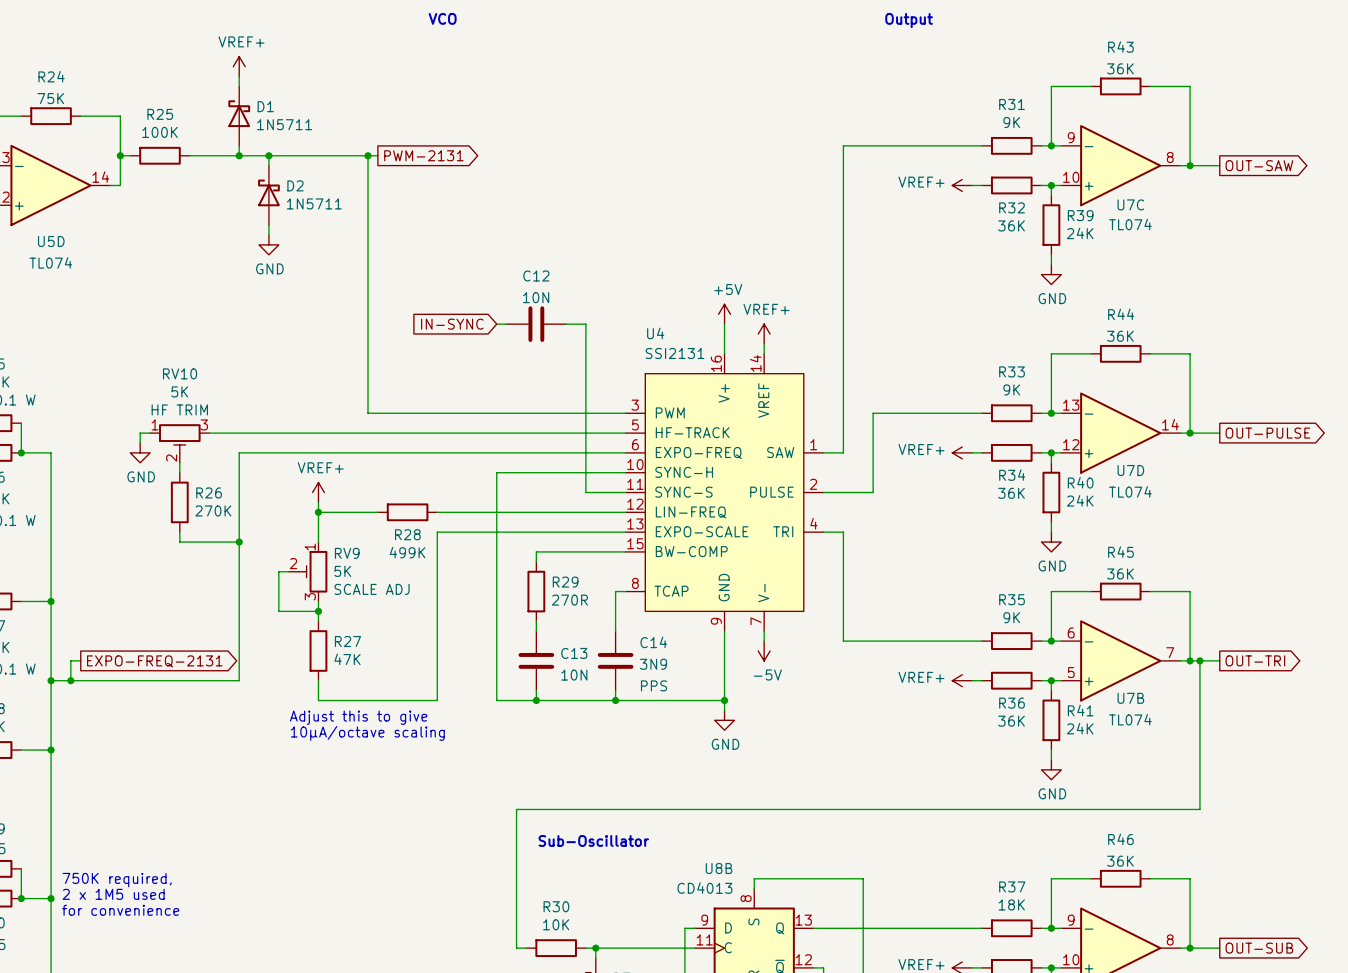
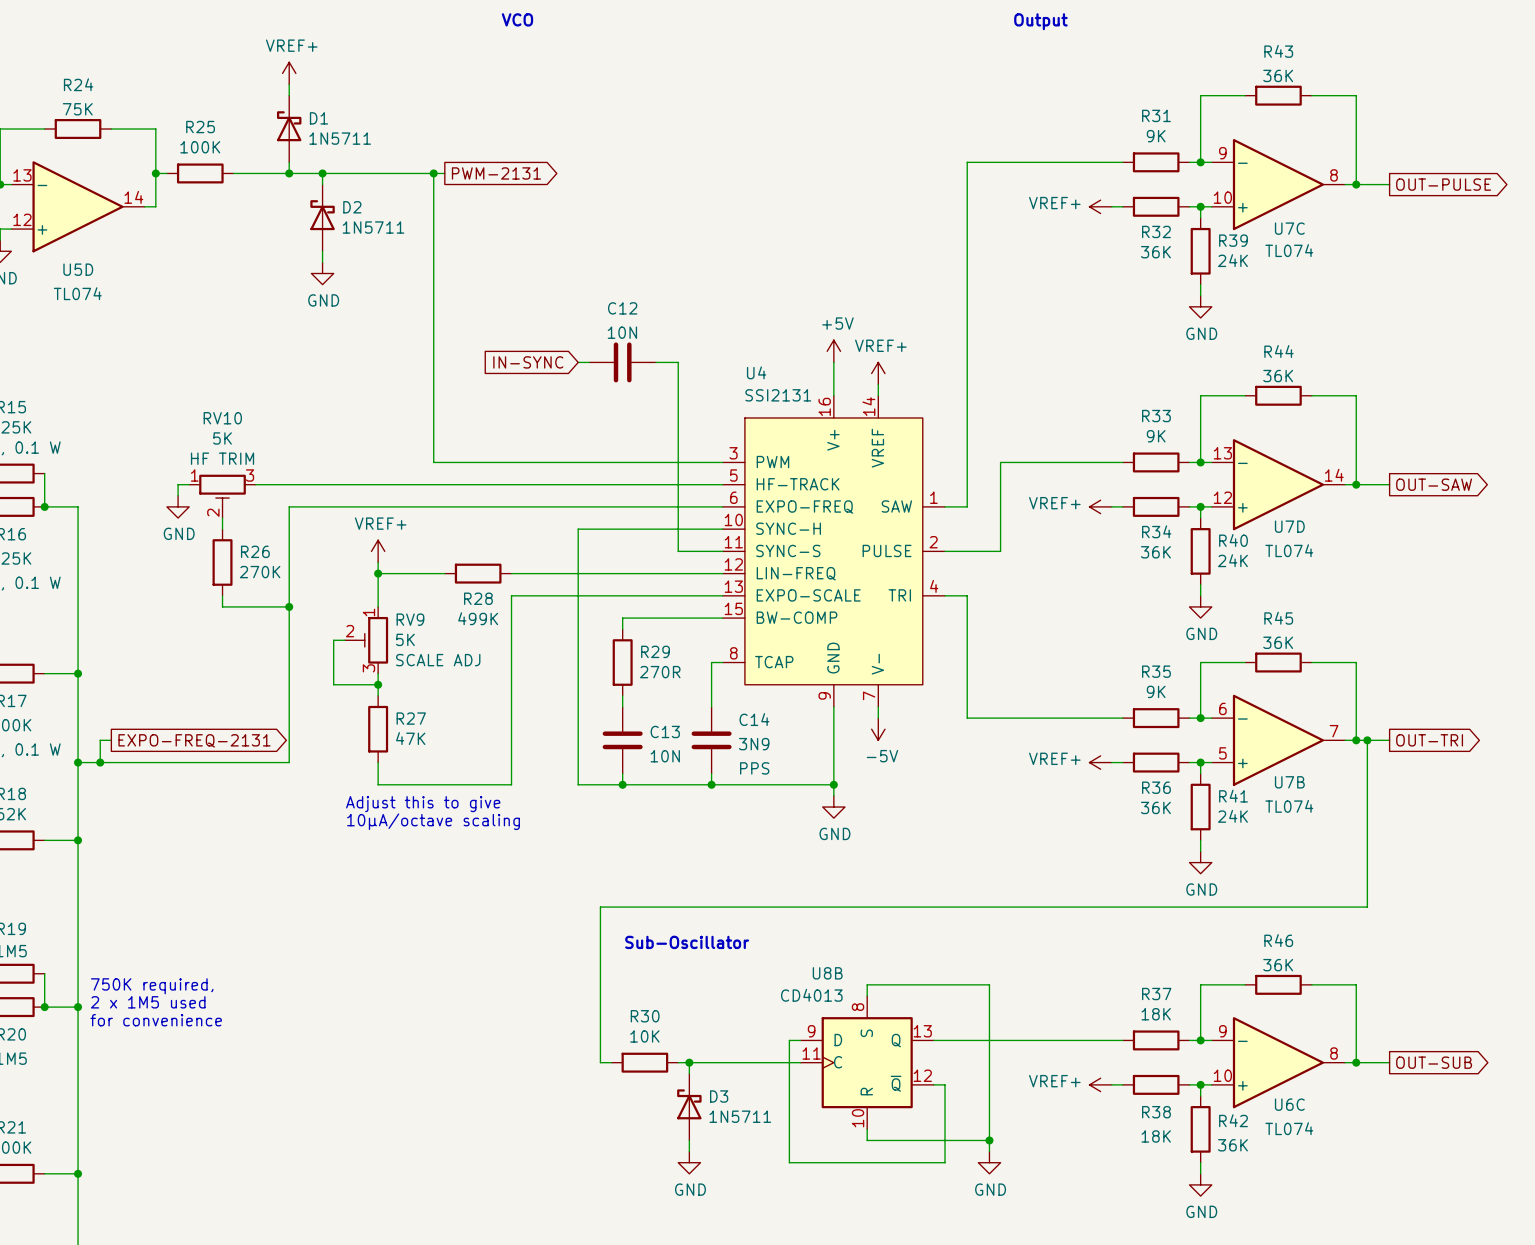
global label: OUT-SAW (1259, 165) -> OUT-PULSE (1443, 184)
global label: OUT-PULSE (1267, 433) -> OUT-SAW (1434, 484)

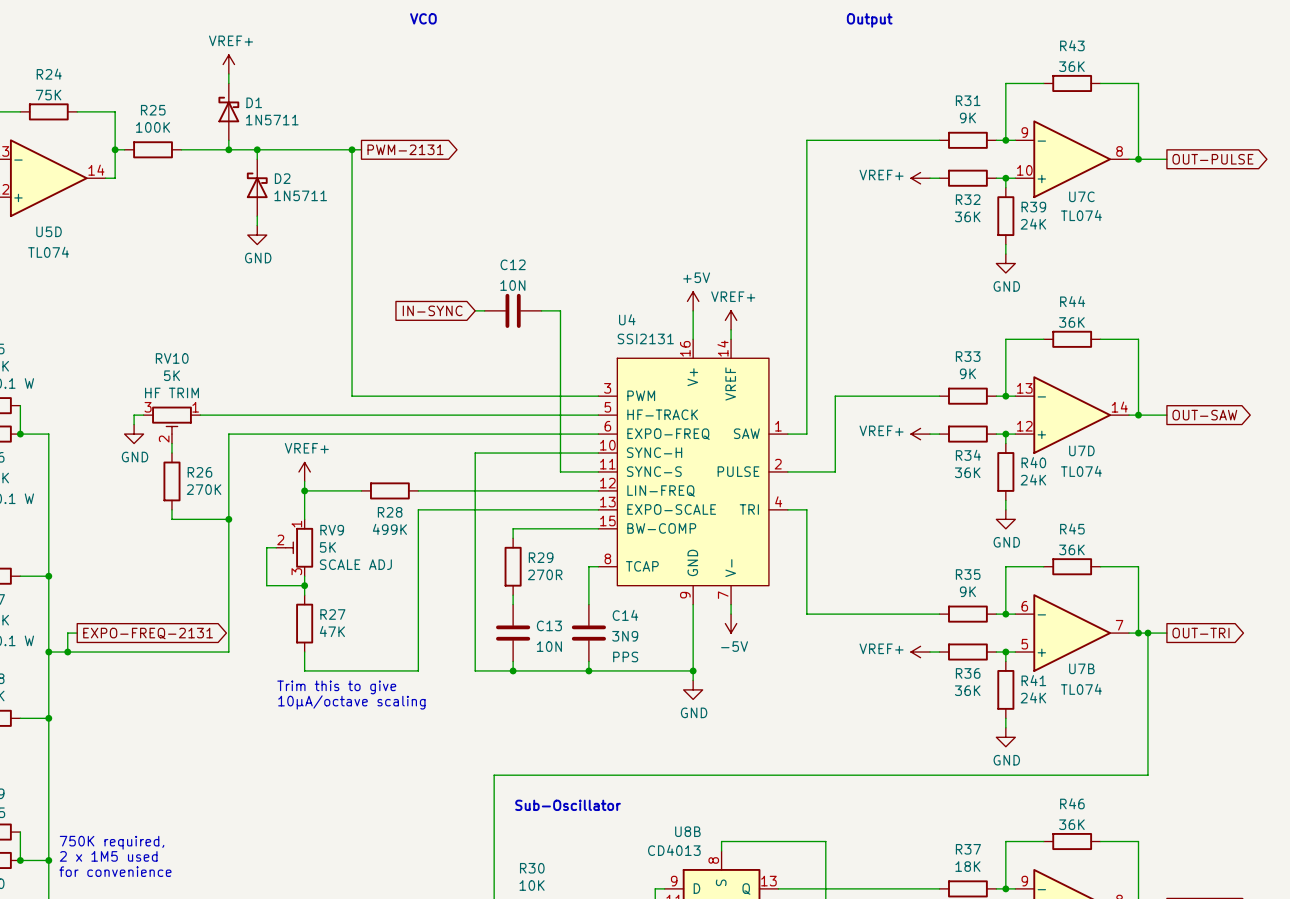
RV10 flip: as is (222, 490) -> left-right (171, 420)
text: Adjust this to give (423, 804) -> Trim this to give (336, 687)

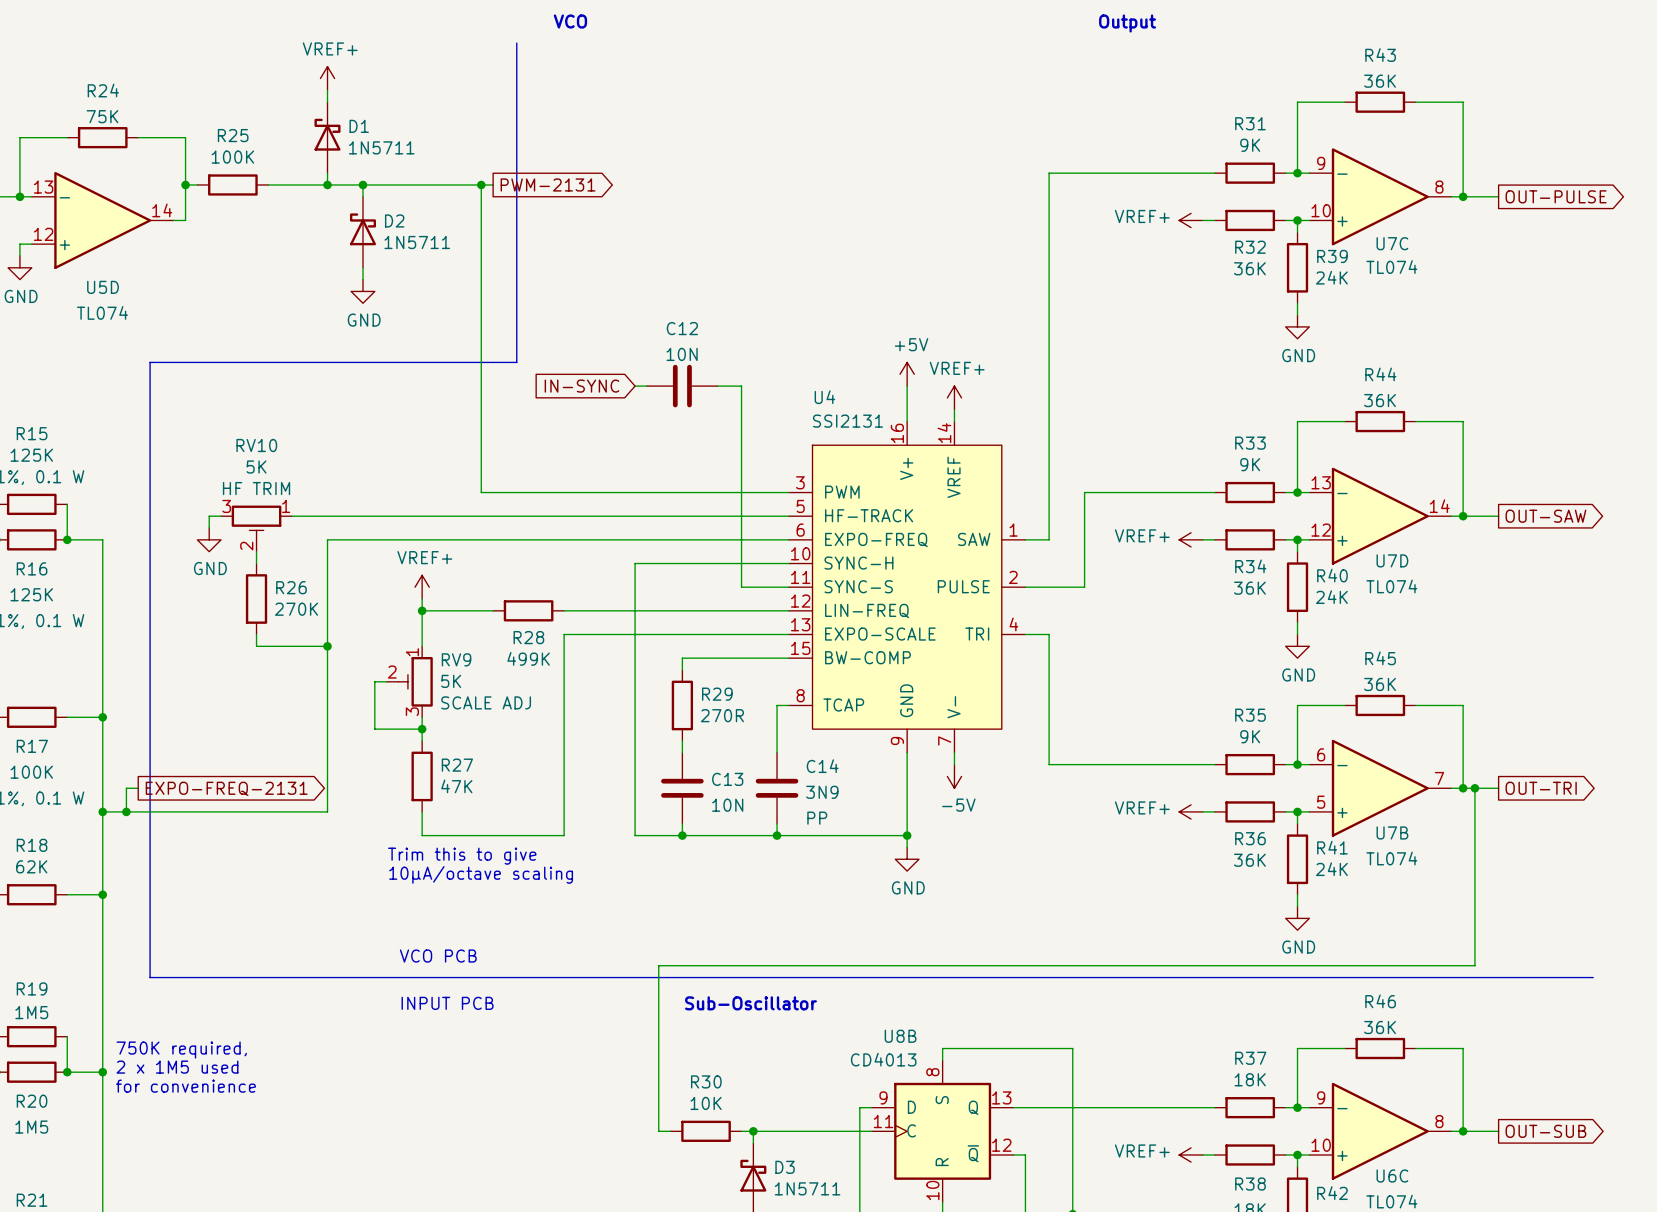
line: none -> (516, 43) (516, 362) (150, 362) (150, 977) (1593, 977)
C14 text: PPS (625, 656) -> PP (817, 818)
text: none -> VCO PCB (438, 956)
text: none -> INPUT PCB (447, 1003)

